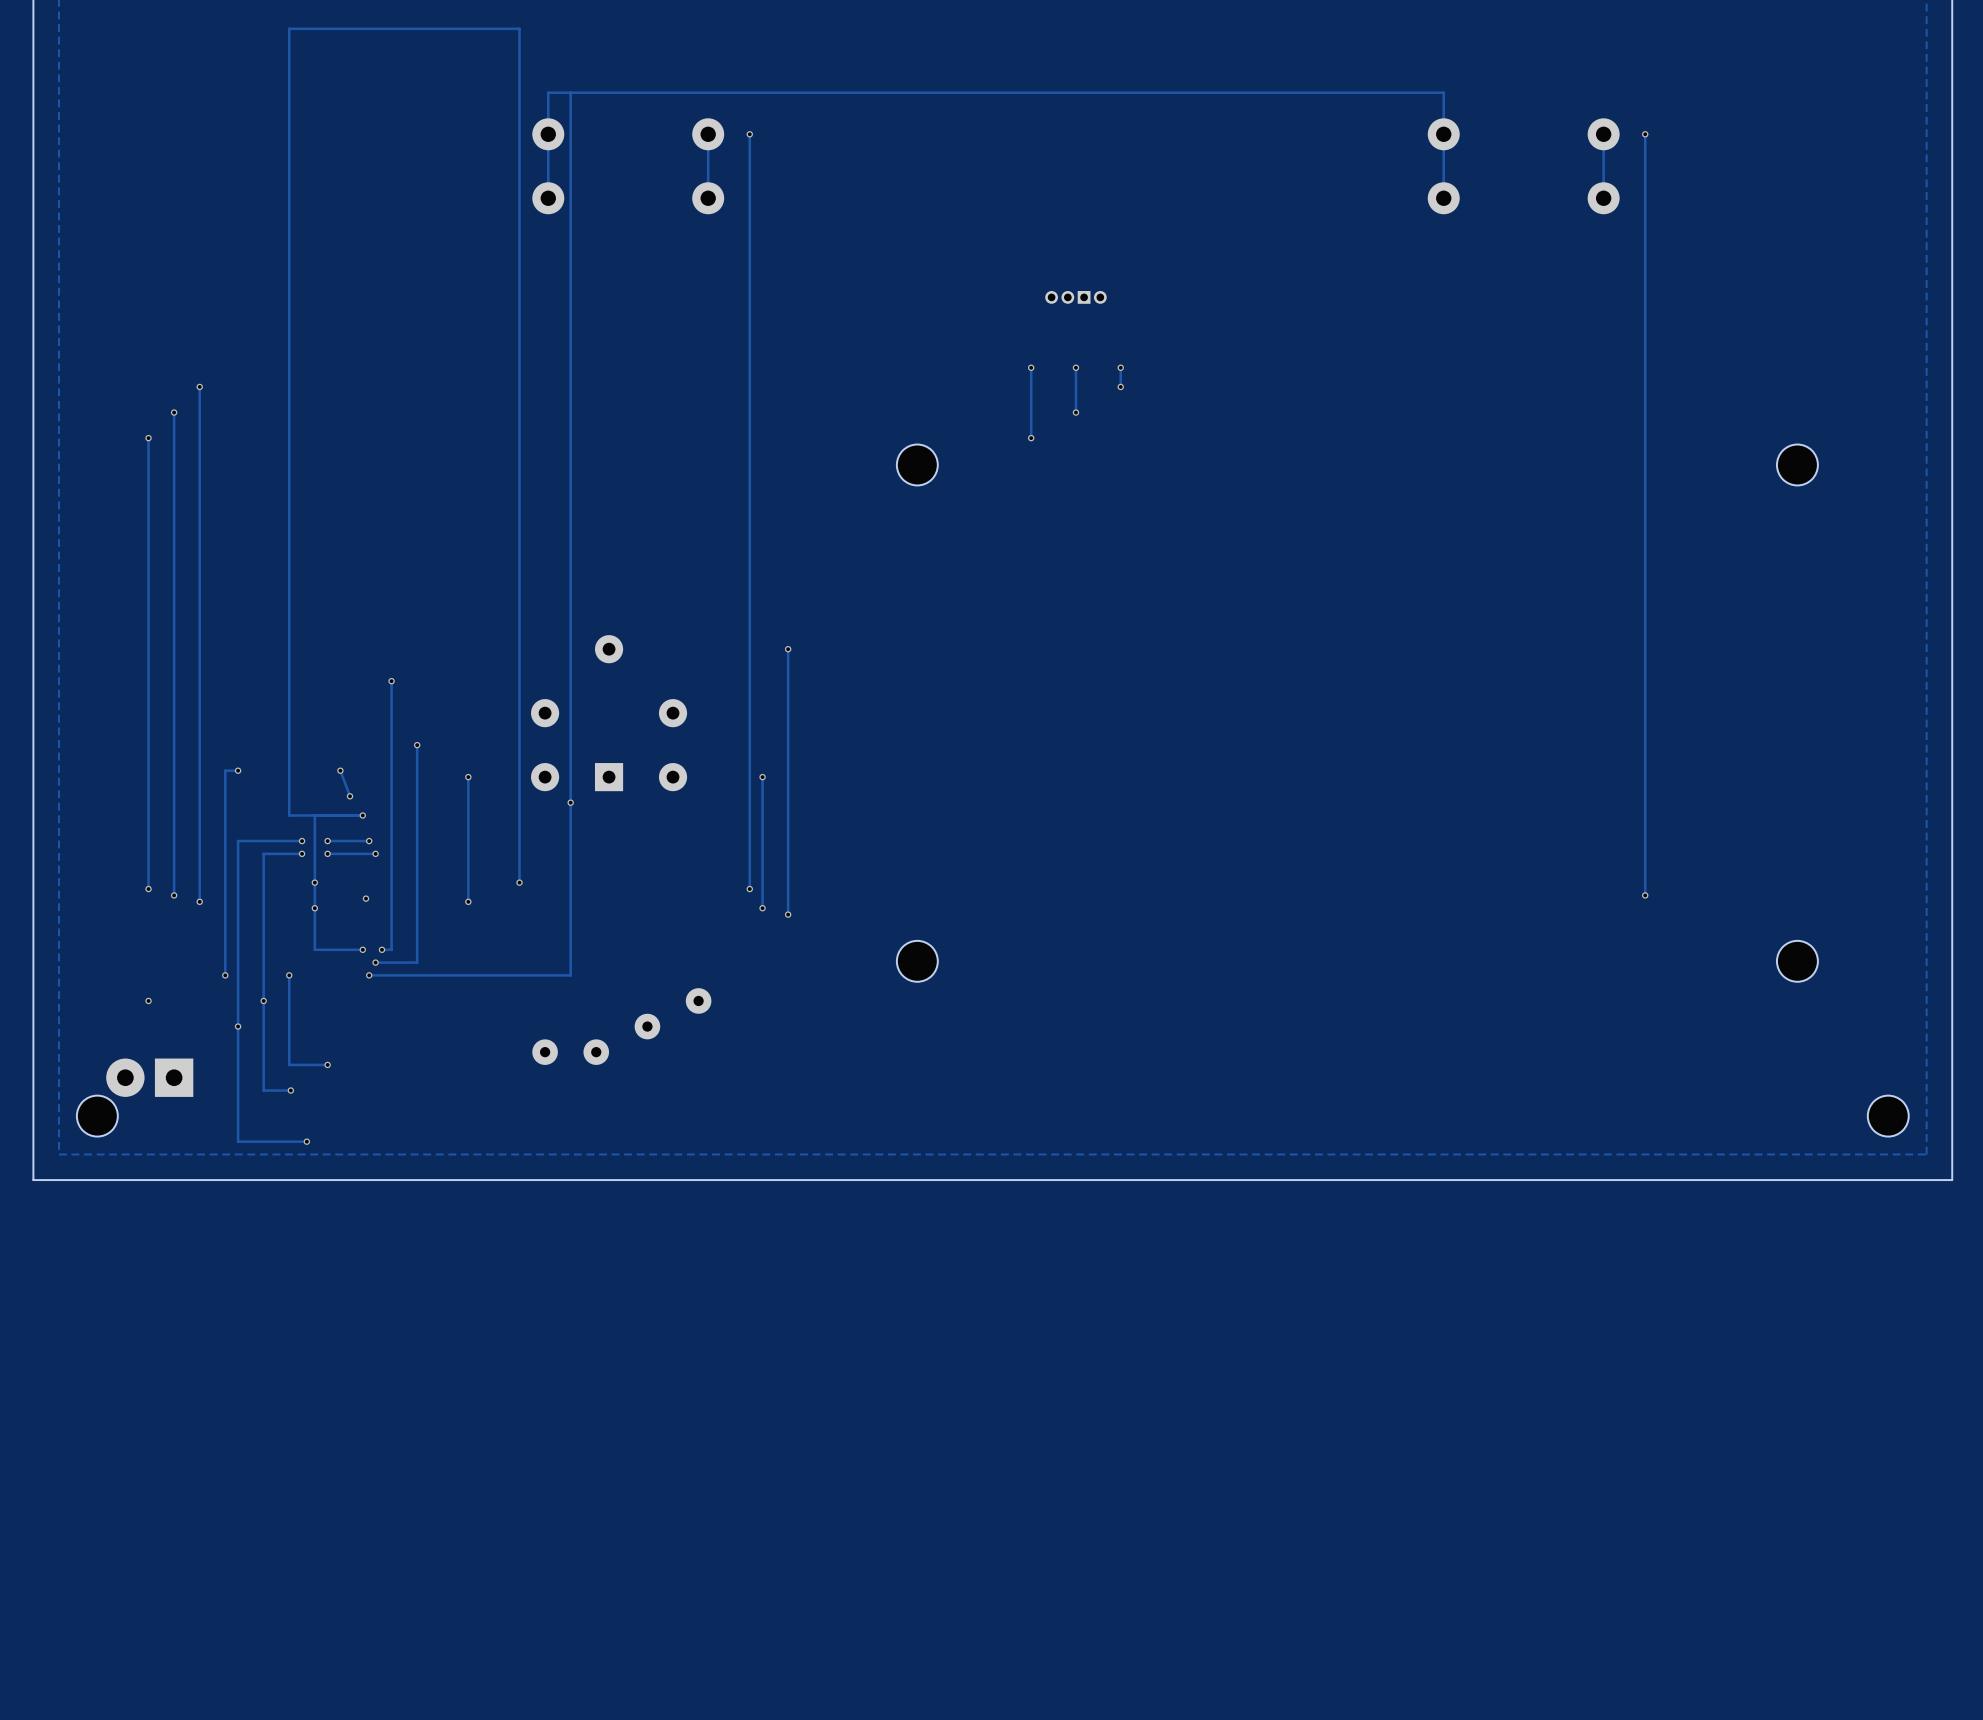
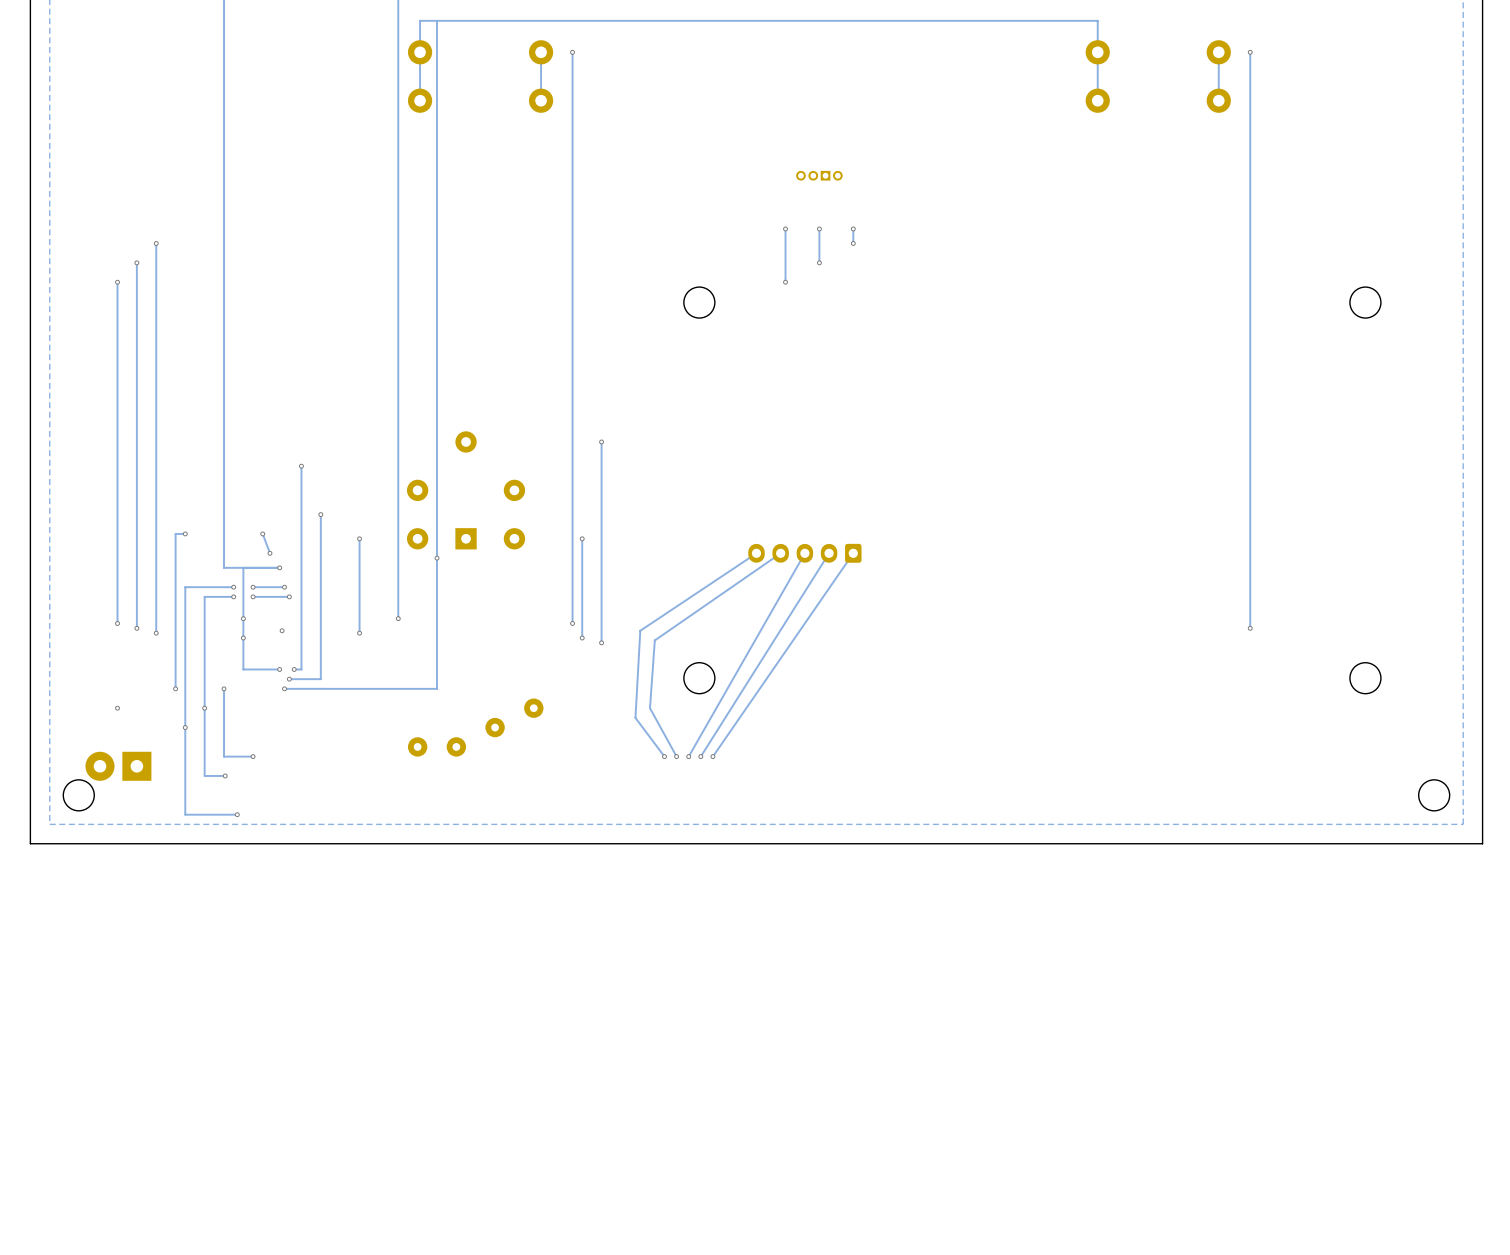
track: none -> (756, 553) (640, 630) (635, 717) (664, 756)
track: none -> (780, 553) (654, 640) (649, 708) (676, 756)
track: none -> (804, 553) (688, 756)
part: none -> (804, 553)
track: none -> (829, 553) (700, 756)
track: none -> (853, 553) (712, 756)
via: none -> (664, 756)
via: none -> (676, 756)
via: none -> (688, 756)
via: none -> (700, 756)
via: none -> (712, 756)

